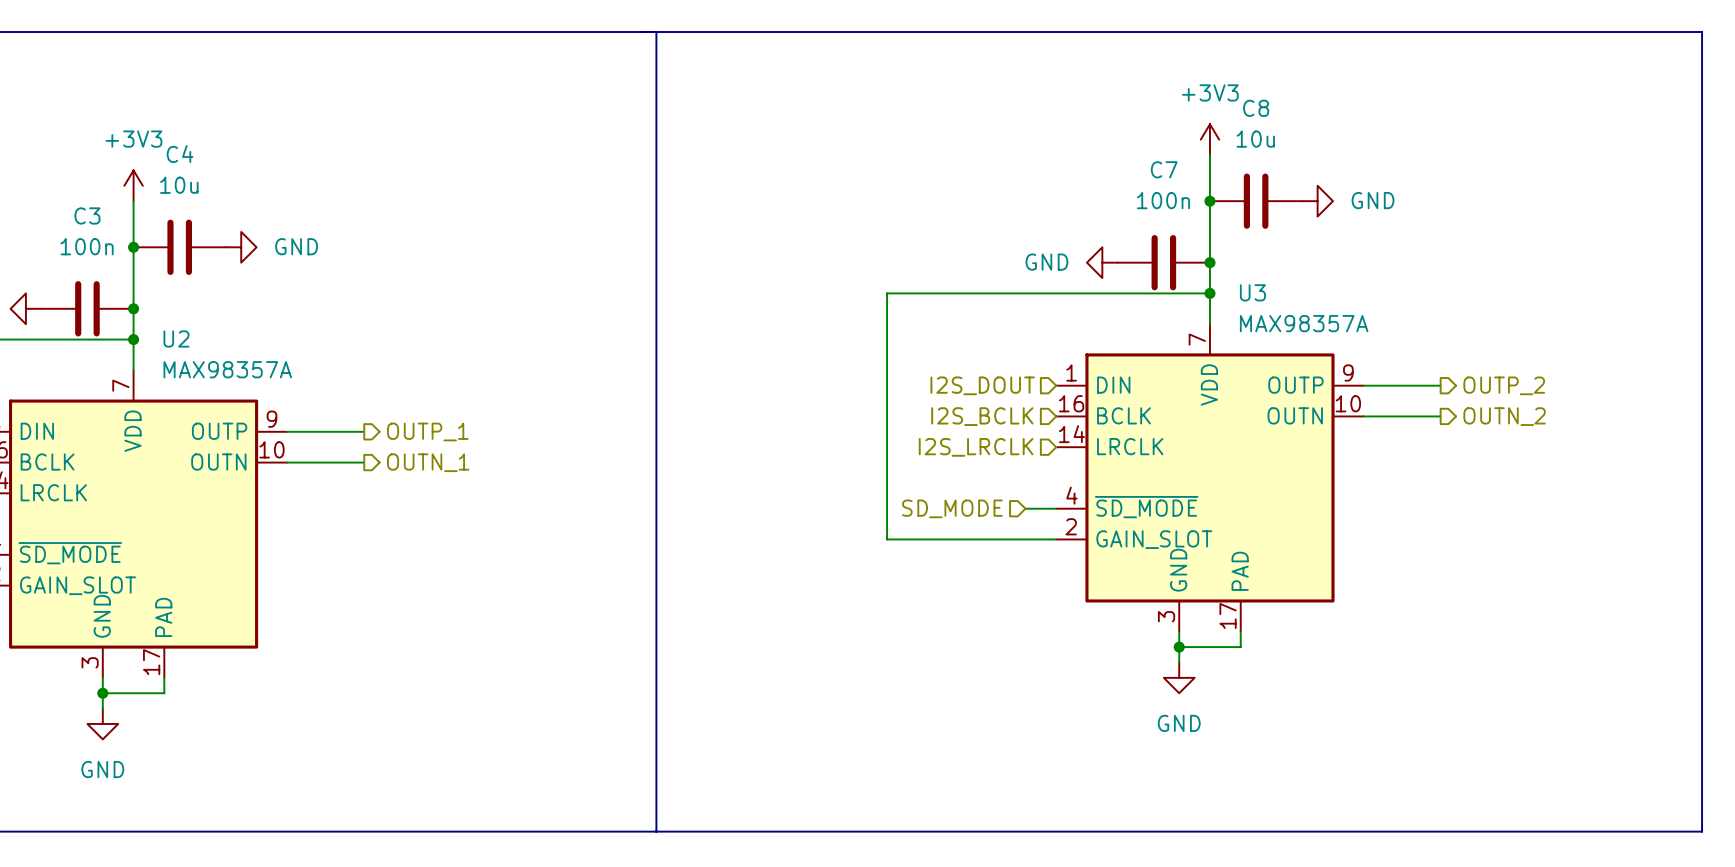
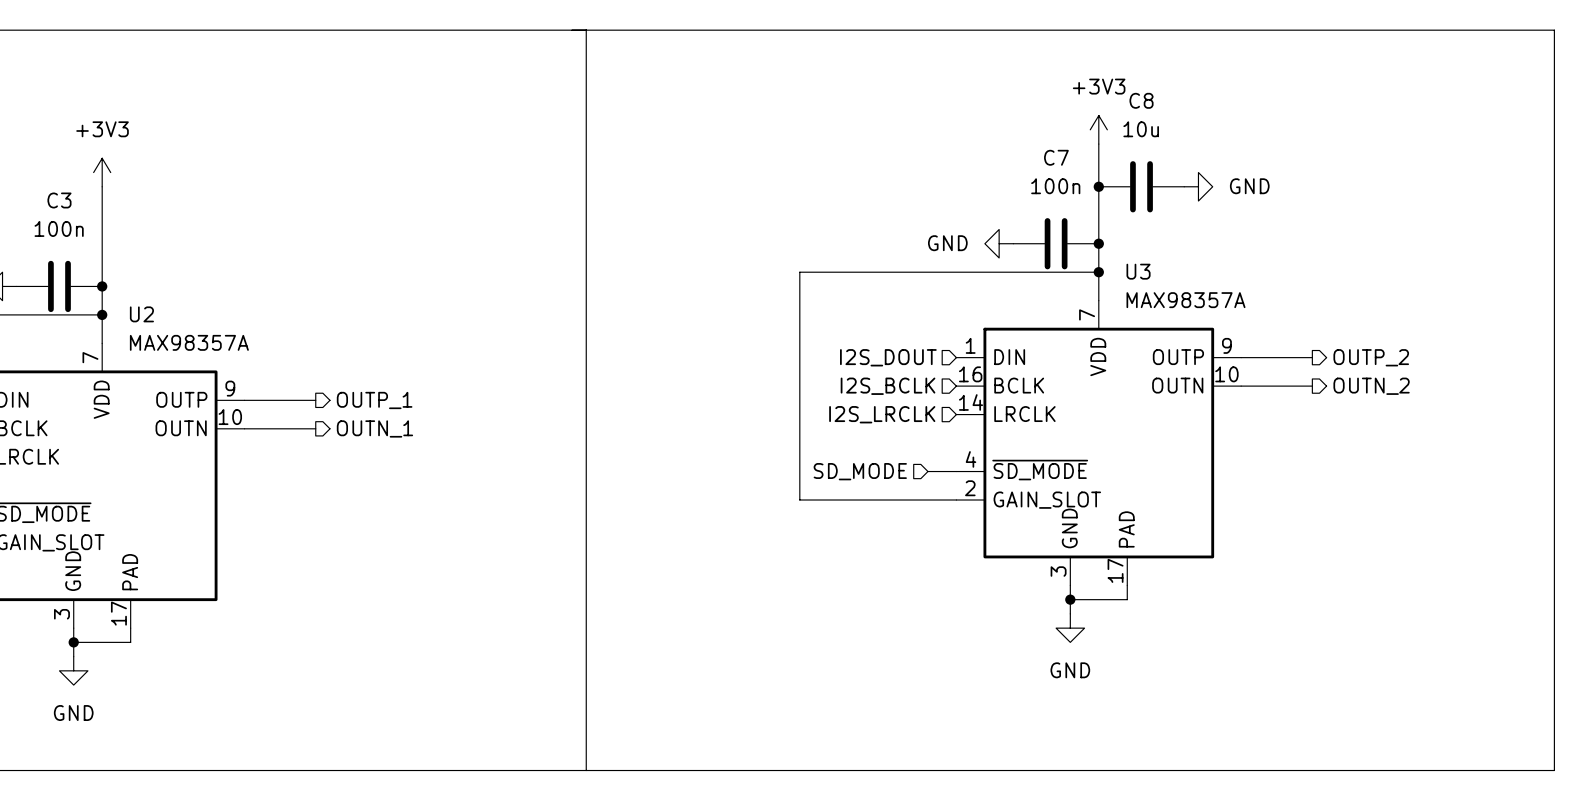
junction: (133, 247) -> none
C4: 10u (179, 247) -> none
power symbol: GND (241, 247) -> none

